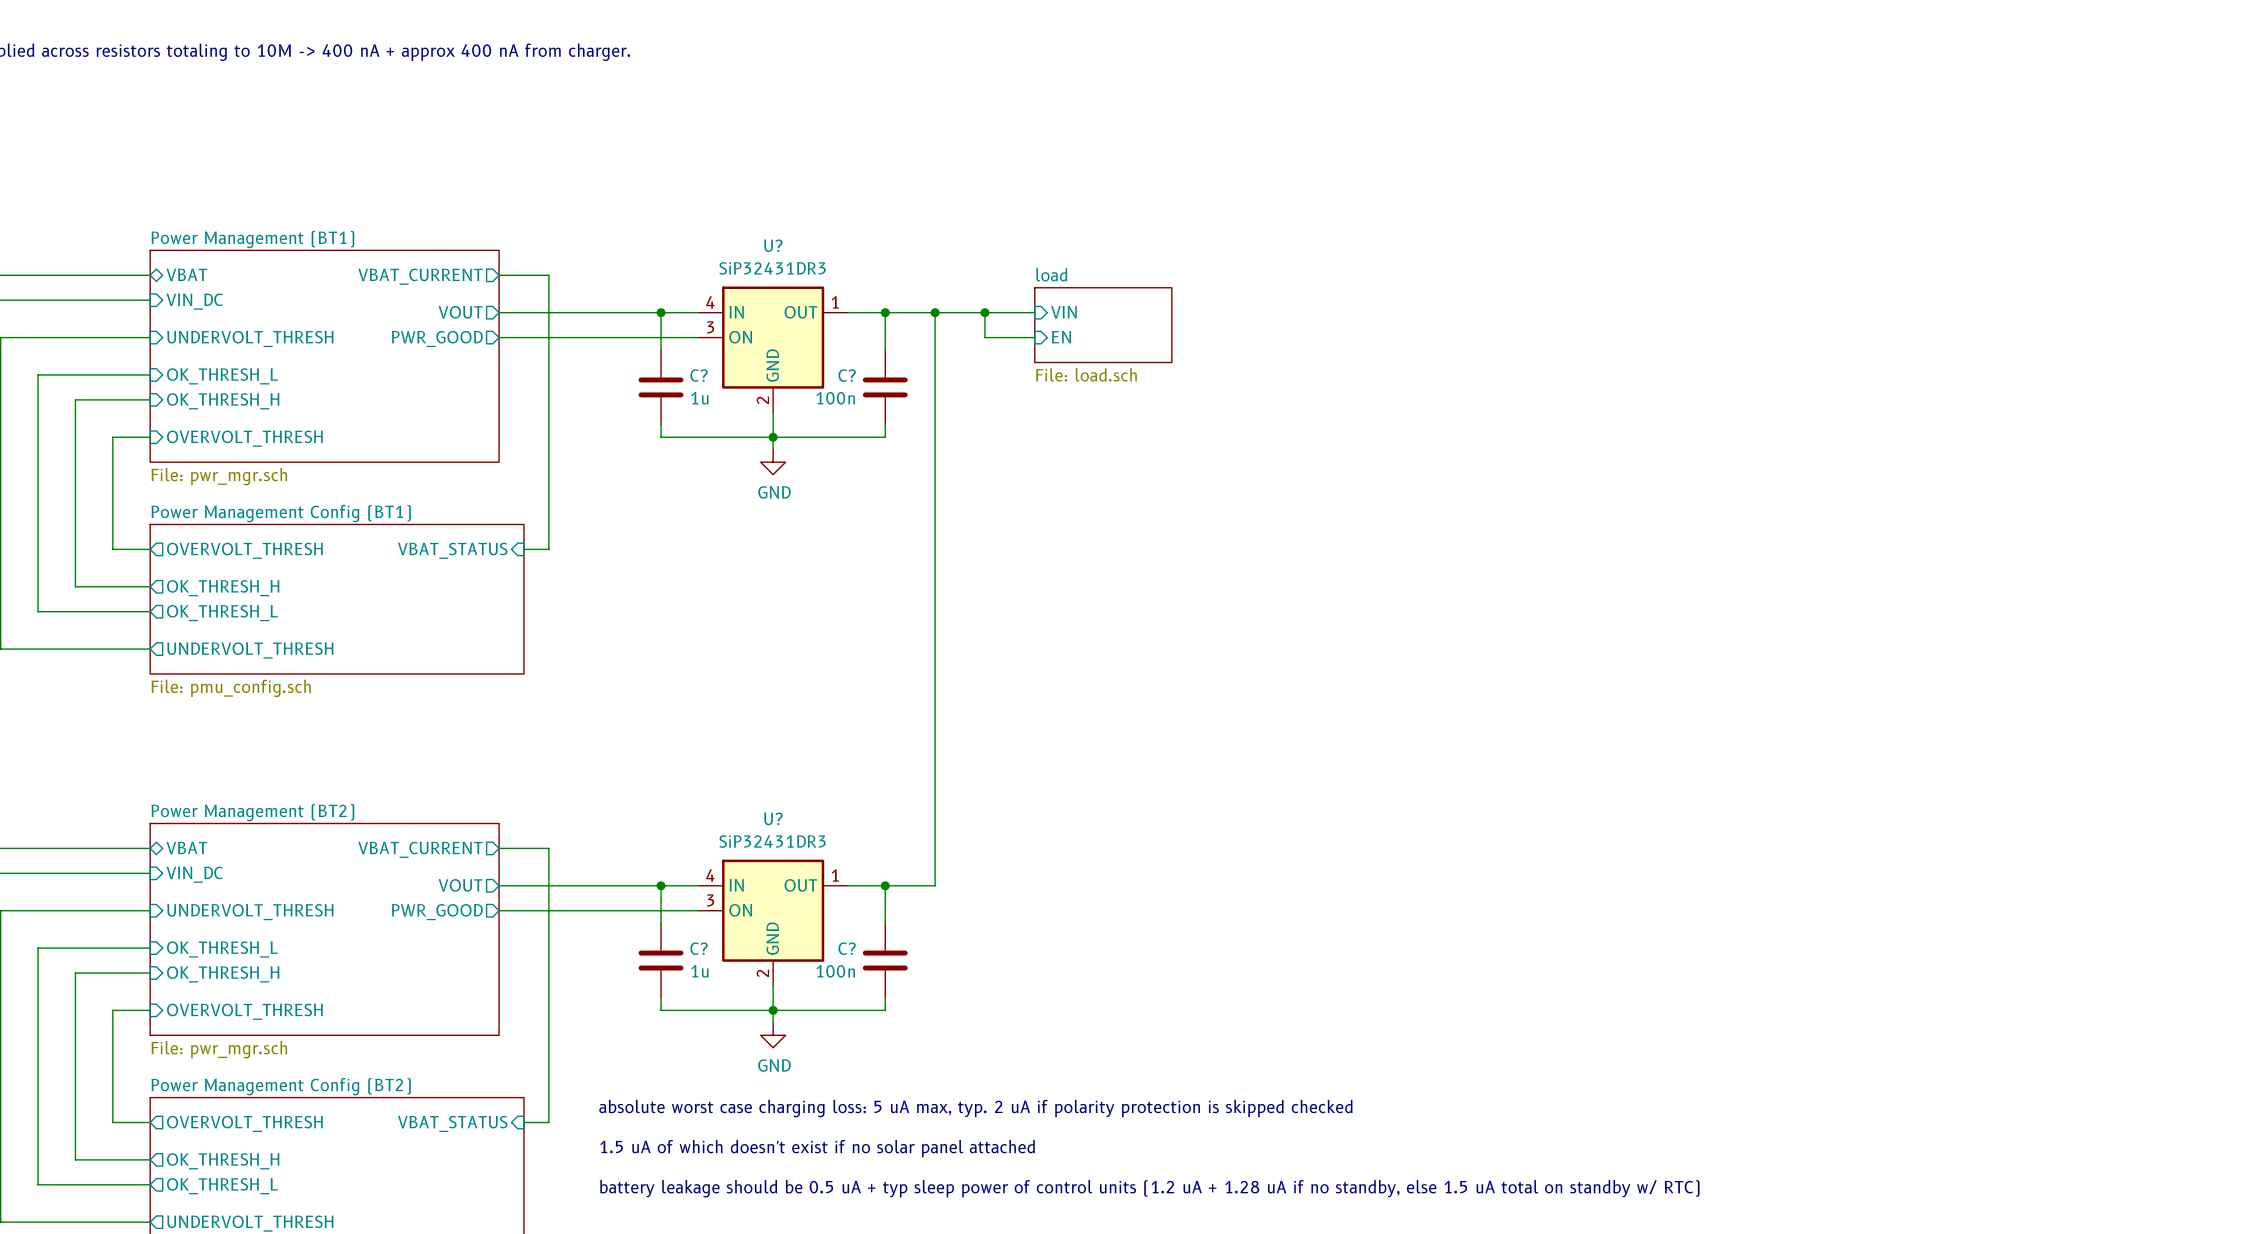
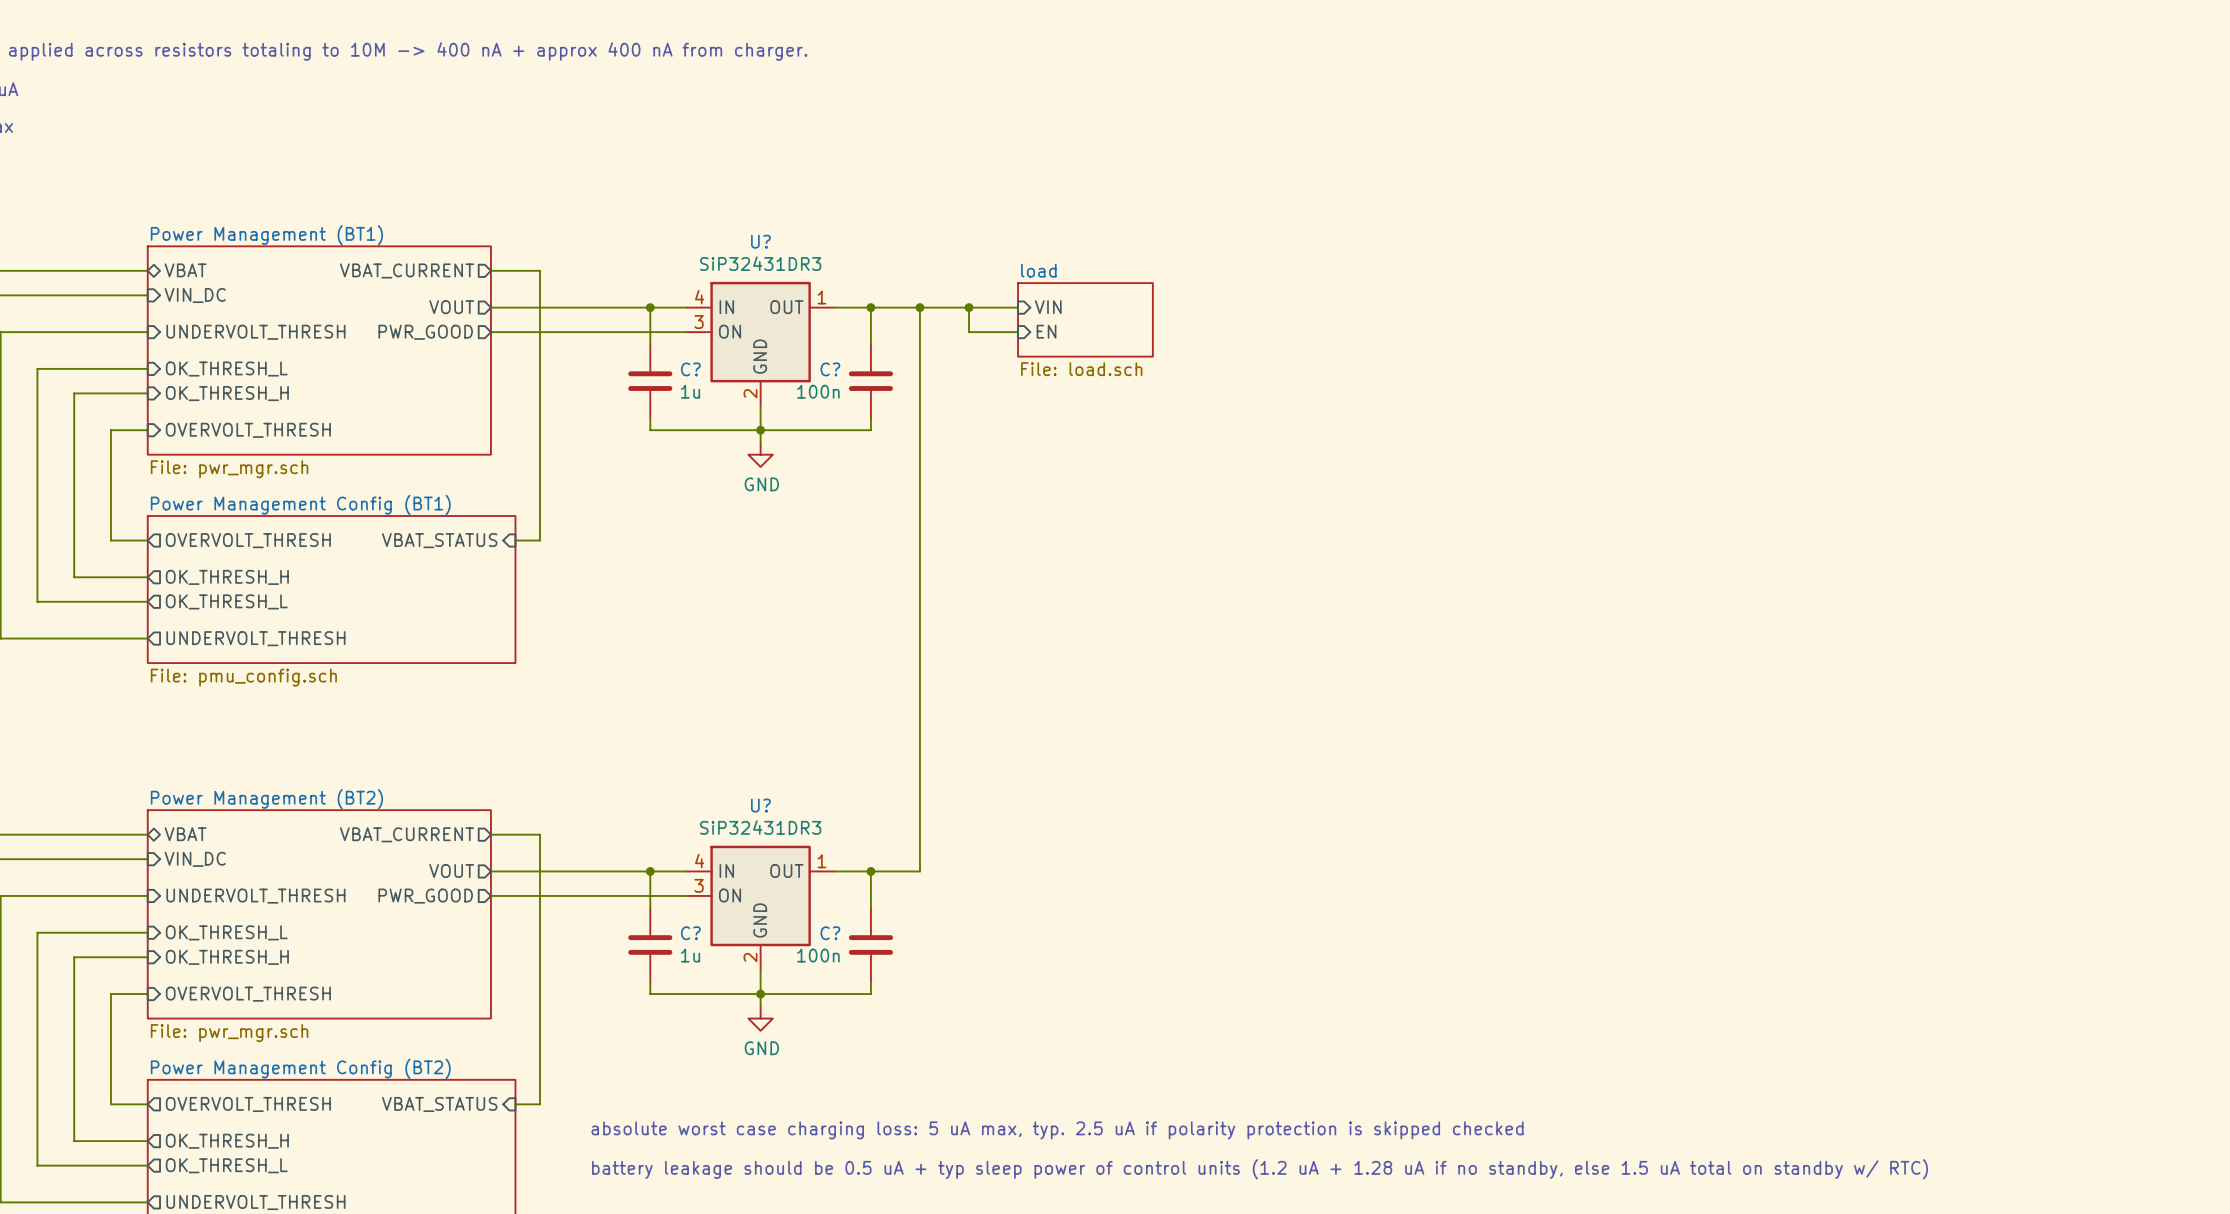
text: absolute worst case charging loss: 5 uA max, typ. 2 uA if polarity protection is skipped checked (975, 1108) -> none
text: 1.5 uA of which doesn't exist if no solar panel attached (817, 1148) -> absolute worst case charging loss: 5 uA max, typ. 2.5 uA if polarity protection is skipped checked (1057, 1130)

